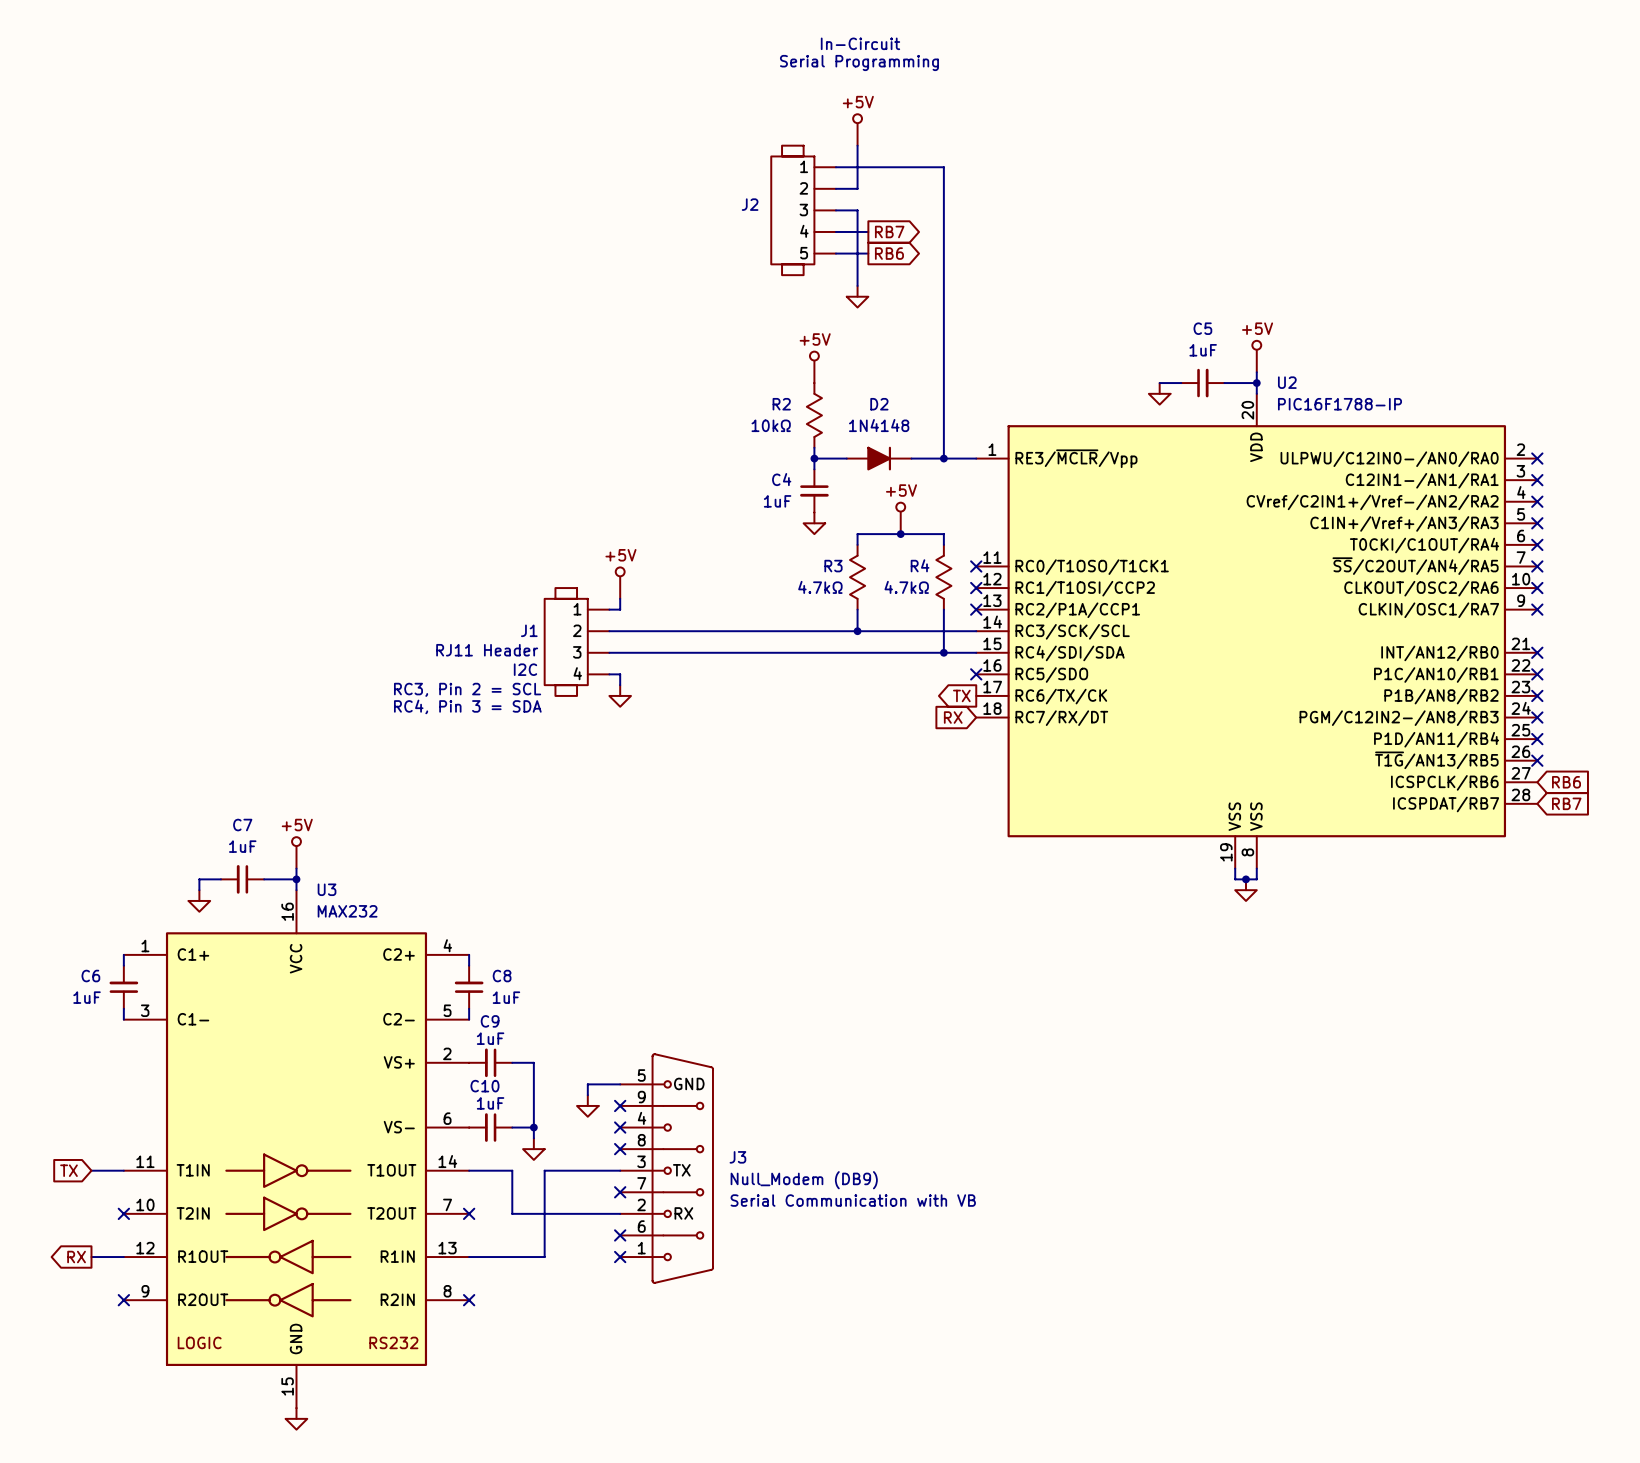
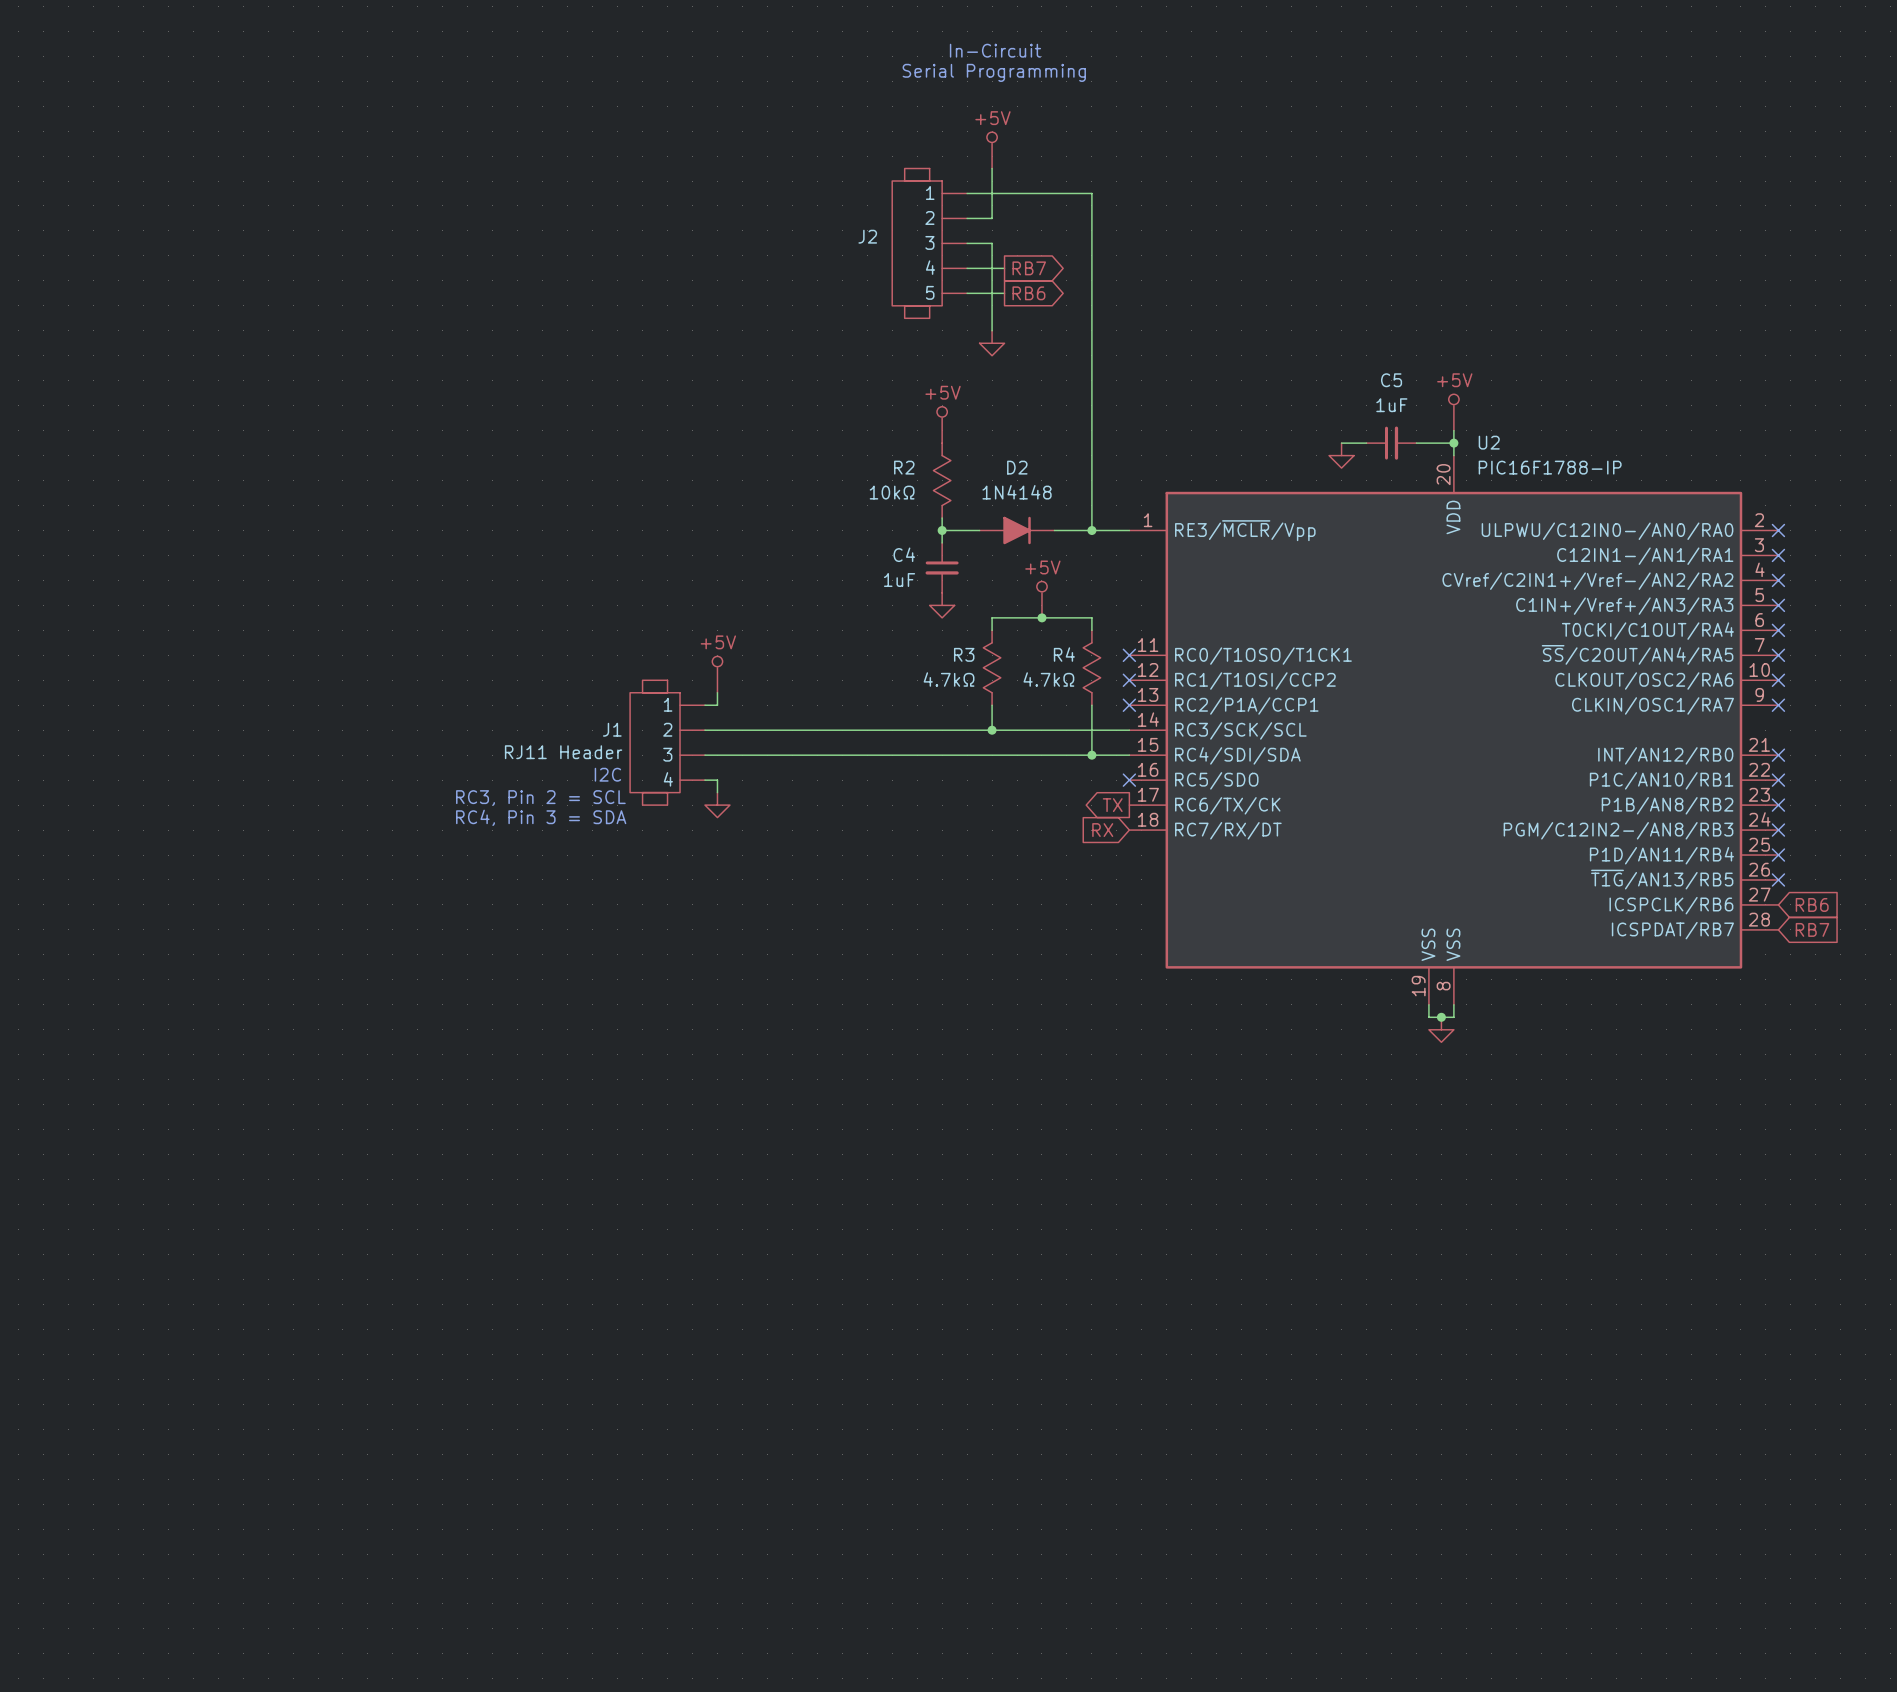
power symbol: (296, 852) -> none
wire: (296, 868) (296, 890) -> none
wire: (220, 879) (199, 879) (199, 890) -> none
C7: 1uF (242, 879) -> none
wire: (264, 879) (296, 879) -> none
junction: (296, 879) -> none
power symbol: (199, 900) -> none
wire: (123, 954) (123, 965) -> none
wire: (469, 954) (469, 965) -> none
C6: 1uF (123, 987) -> none
C8: 1uF (469, 987) -> none
wire: (123, 1008) (123, 1019) -> none
wire: (469, 1008) (469, 1019) -> none
C9: 1uF (490, 1062) -> none
wire: (512, 1062) (533, 1062) (533, 1138) -> none
wire: (620, 1084) (587, 1084) (587, 1095) -> none
power symbol: (587, 1105) -> none
no-connect mark: (620, 1105) -> none
C10: 1uF (490, 1127) -> none
wire: (512, 1127) (533, 1127) -> none
junction: (533, 1127) -> none
no-connect mark: (620, 1127) -> none
U3: MAX232 (296, 1149) -> none
power symbol: (533, 1149) -> none
no-connect mark: (620, 1149) -> none
J3: Null_Modem (DB9) (666, 1168) -> none
global label: TX (68, 1170) -> none
wire: (91, 1170) (123, 1170) -> none
wire: (469, 1170) (512, 1170) (512, 1213) (620, 1213) -> none
wire: (620, 1170) (544, 1170) (544, 1257) (469, 1257) -> none
no-connect mark: (620, 1192) -> none
text: Serial Communication with VB (853, 1200) -> none
no-connect mark: (123, 1213) -> none
no-connect mark: (469, 1213) -> none
no-connect mark: (620, 1235) -> none
global label: RX (76, 1257) -> none
wire: (91, 1257) (123, 1257) -> none
no-connect mark: (620, 1257) -> none
no-connect mark: (123, 1300) -> none
no-connect mark: (469, 1300) -> none
power symbol: (296, 1418) -> none

